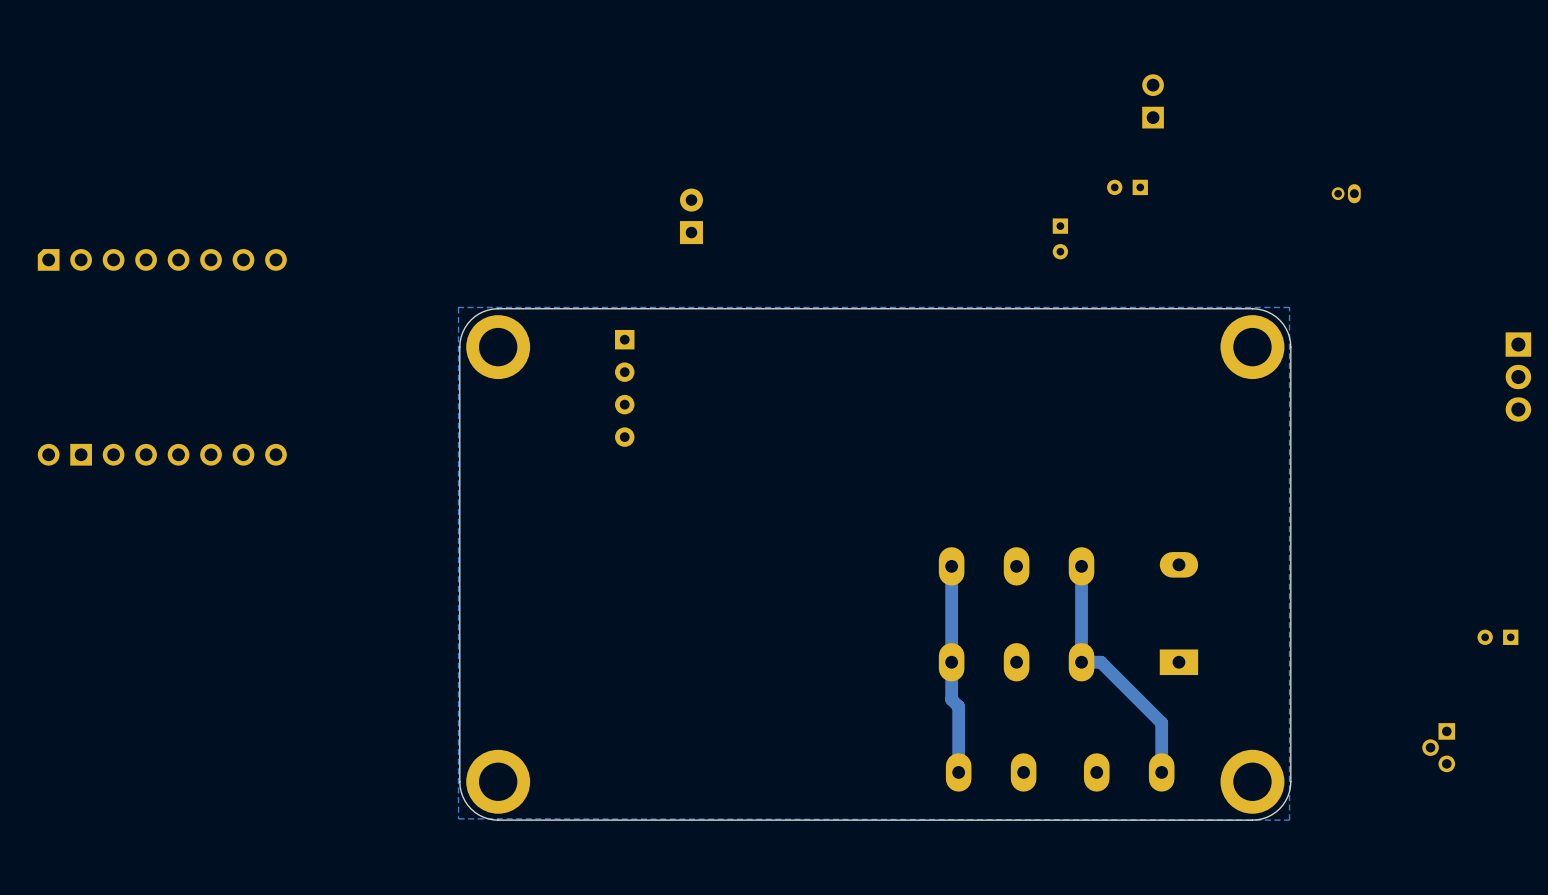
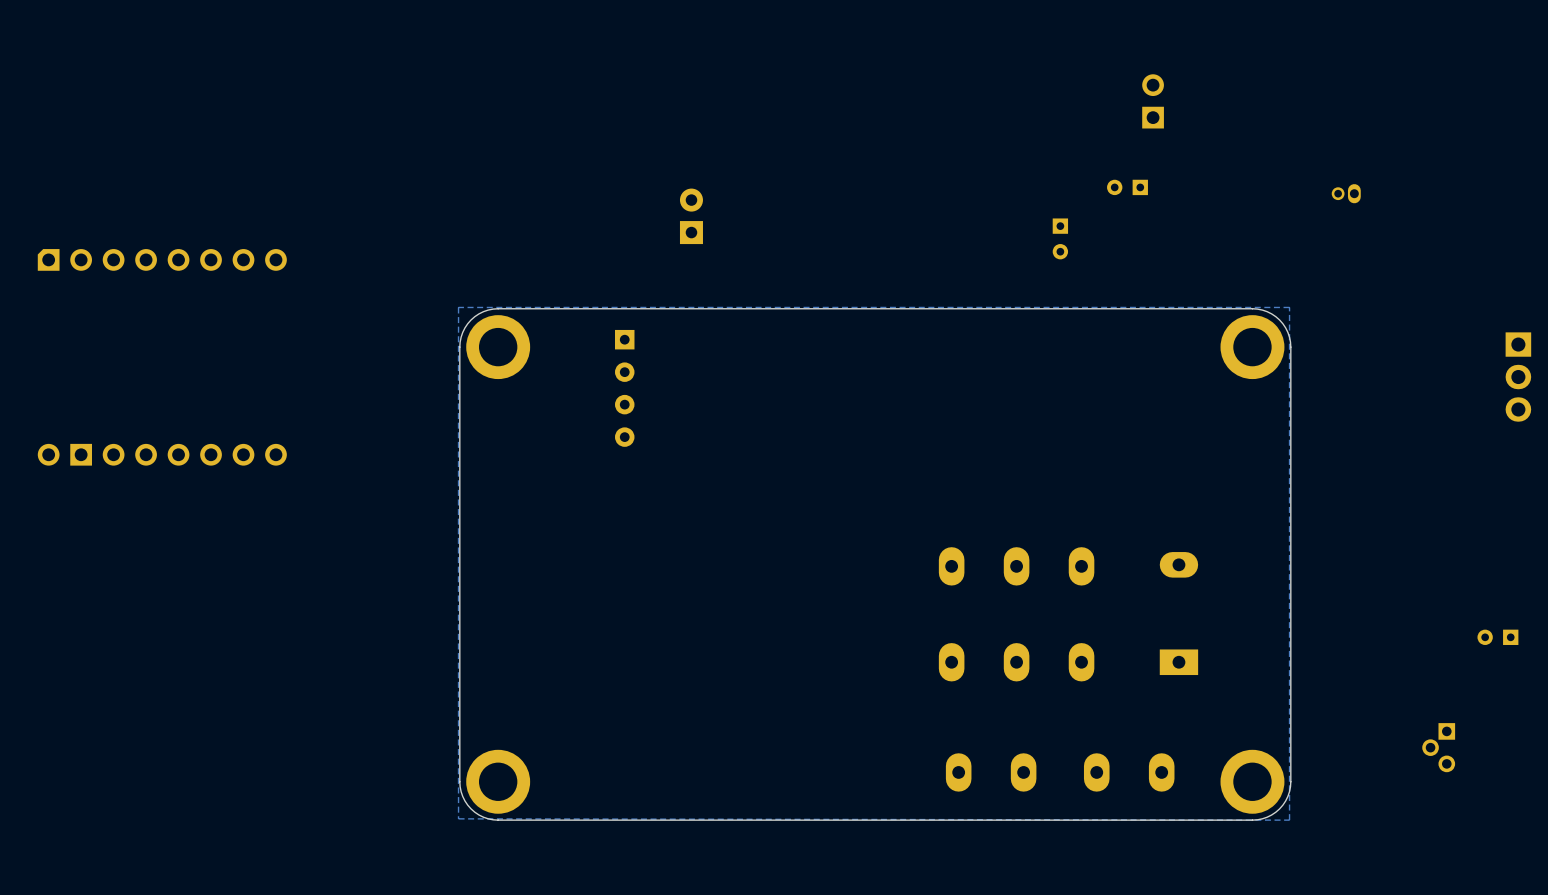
track: (951, 566) (951, 699) (958, 706) (958, 772) -> none
track: (1081, 566) (1081, 662) (1100, 662) (1161, 722) (1161, 772) -> none

